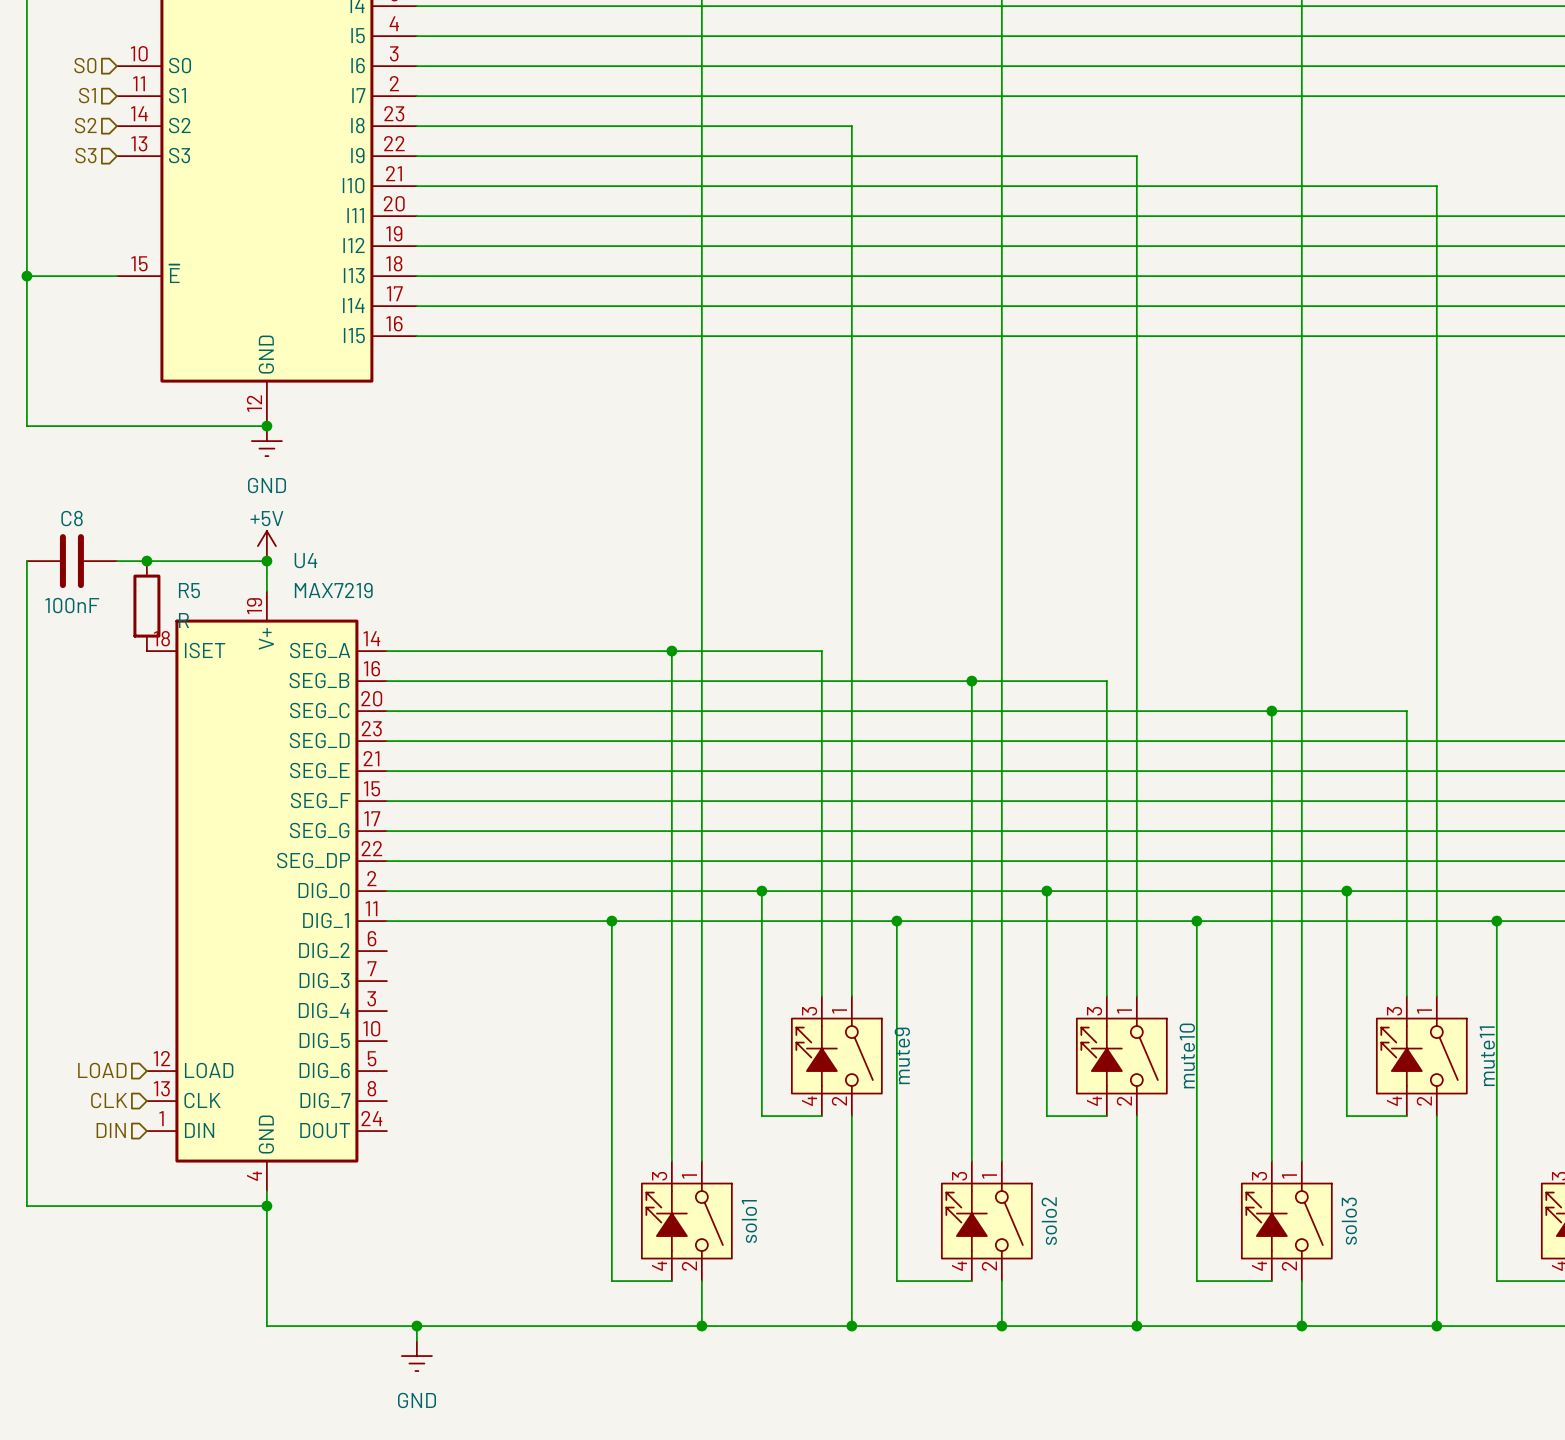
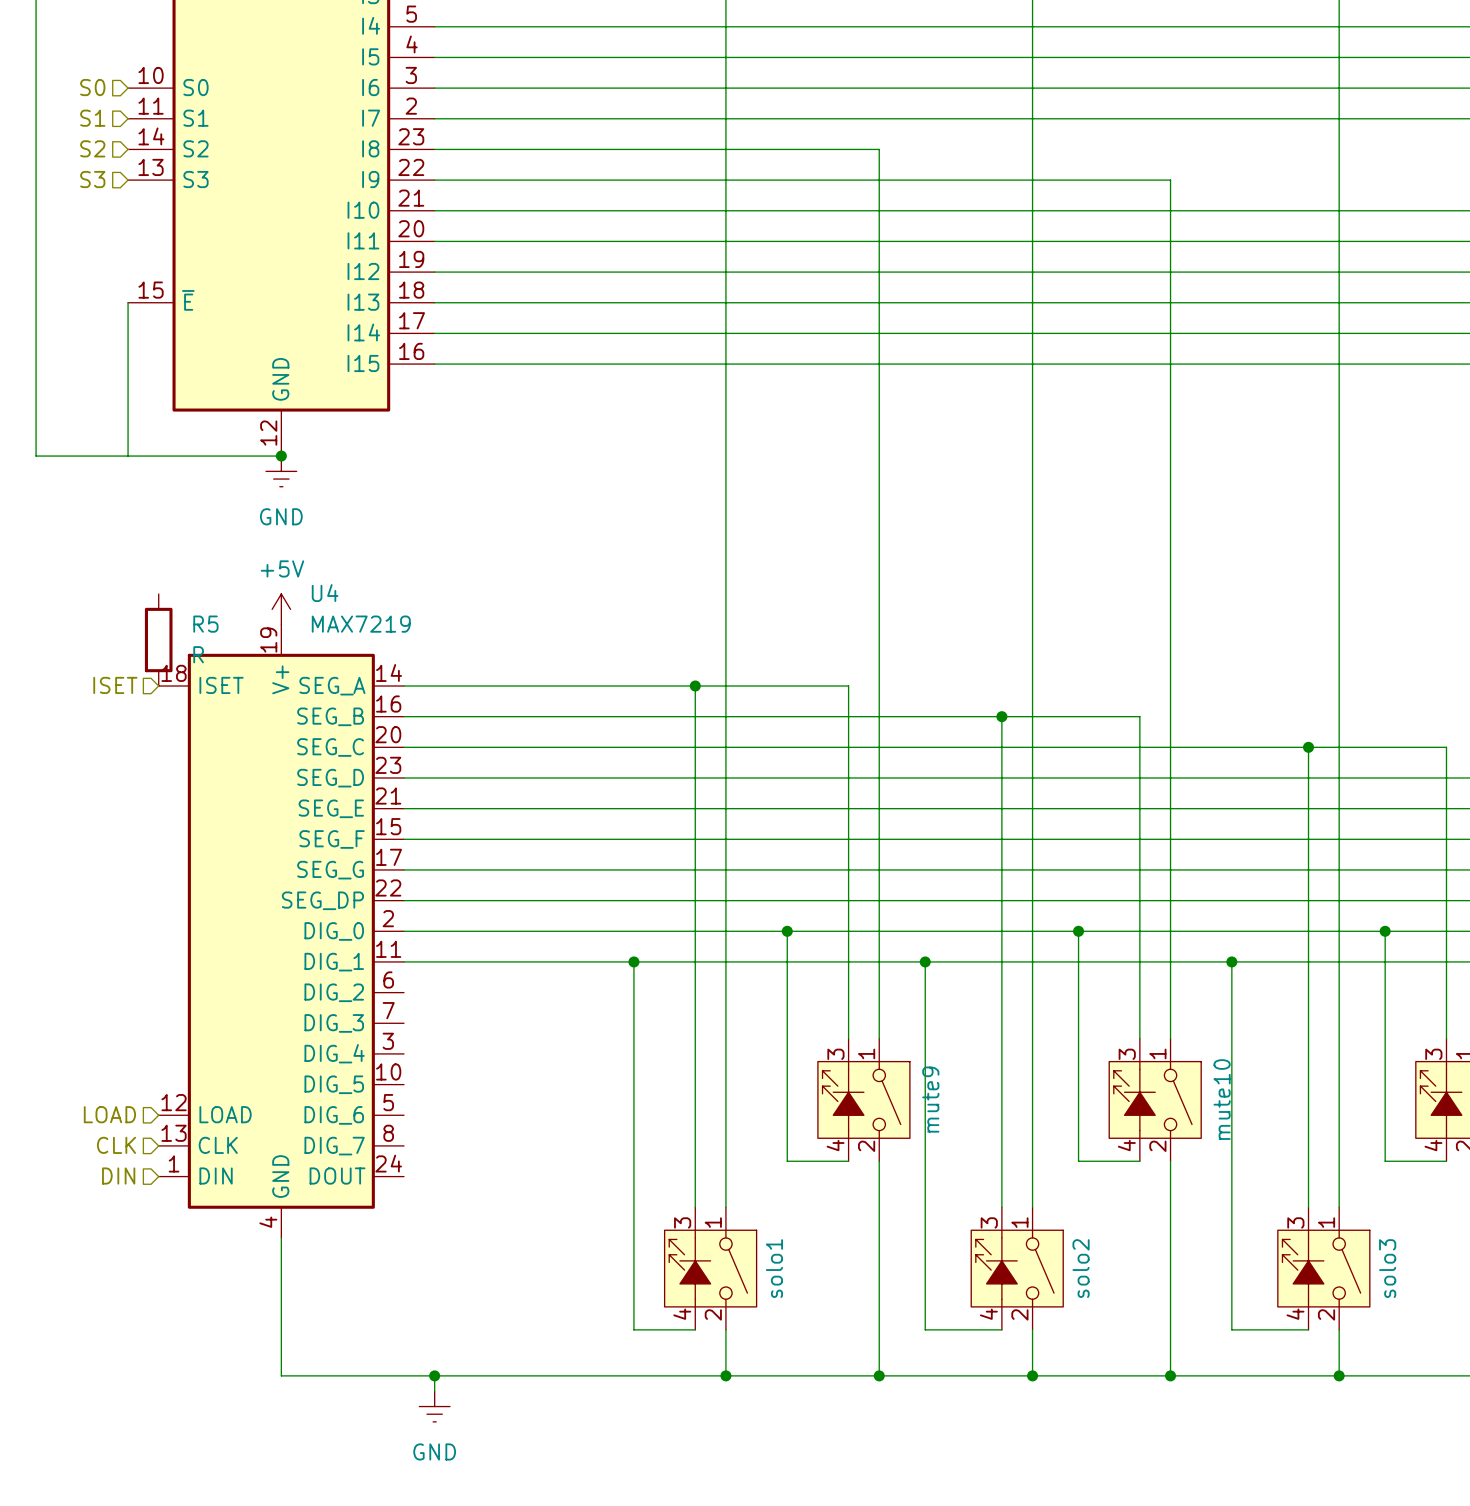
wire: (26, 276) (116, 276) -> (128, 456) (128, 302)
junction: (26, 276) -> none
power symbol text position: +5V (266, 518) -> +5V (282, 568)
power symbol position: +5V (266, 546) -> +5V (281, 609)
wire: (26, 561) (26, 1206) (266, 1206) -> none
C8: 100nF (71, 561) -> none
wire: (116, 561) (266, 561) (266, 591) -> none
junction: (146, 561) -> none
junction: (266, 561) -> none
hierarchical label: none -> ISET (115, 685)
junction: (266, 1206) -> none

